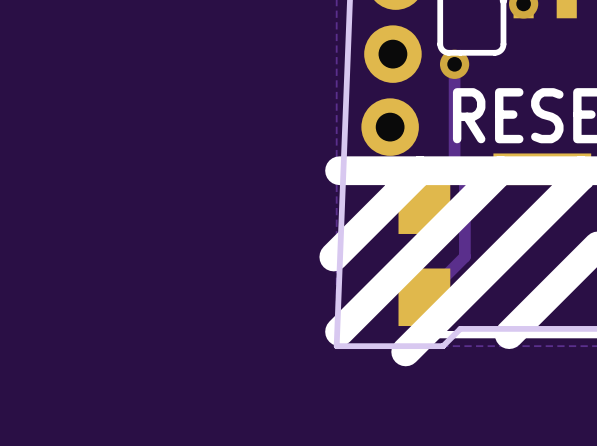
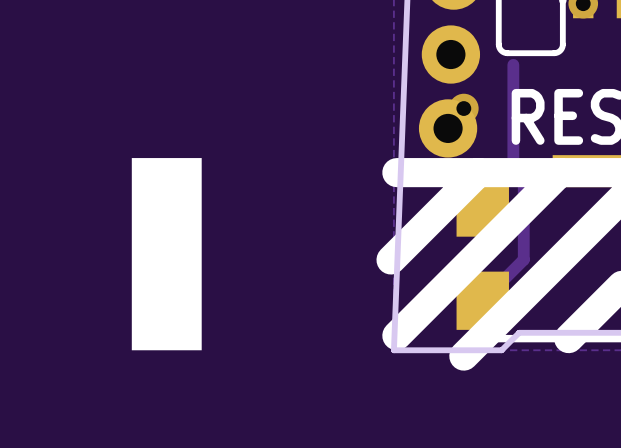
via position: (454, 64) -> (463, 108)
drawing: none -> [131, 158, 202, 351]

